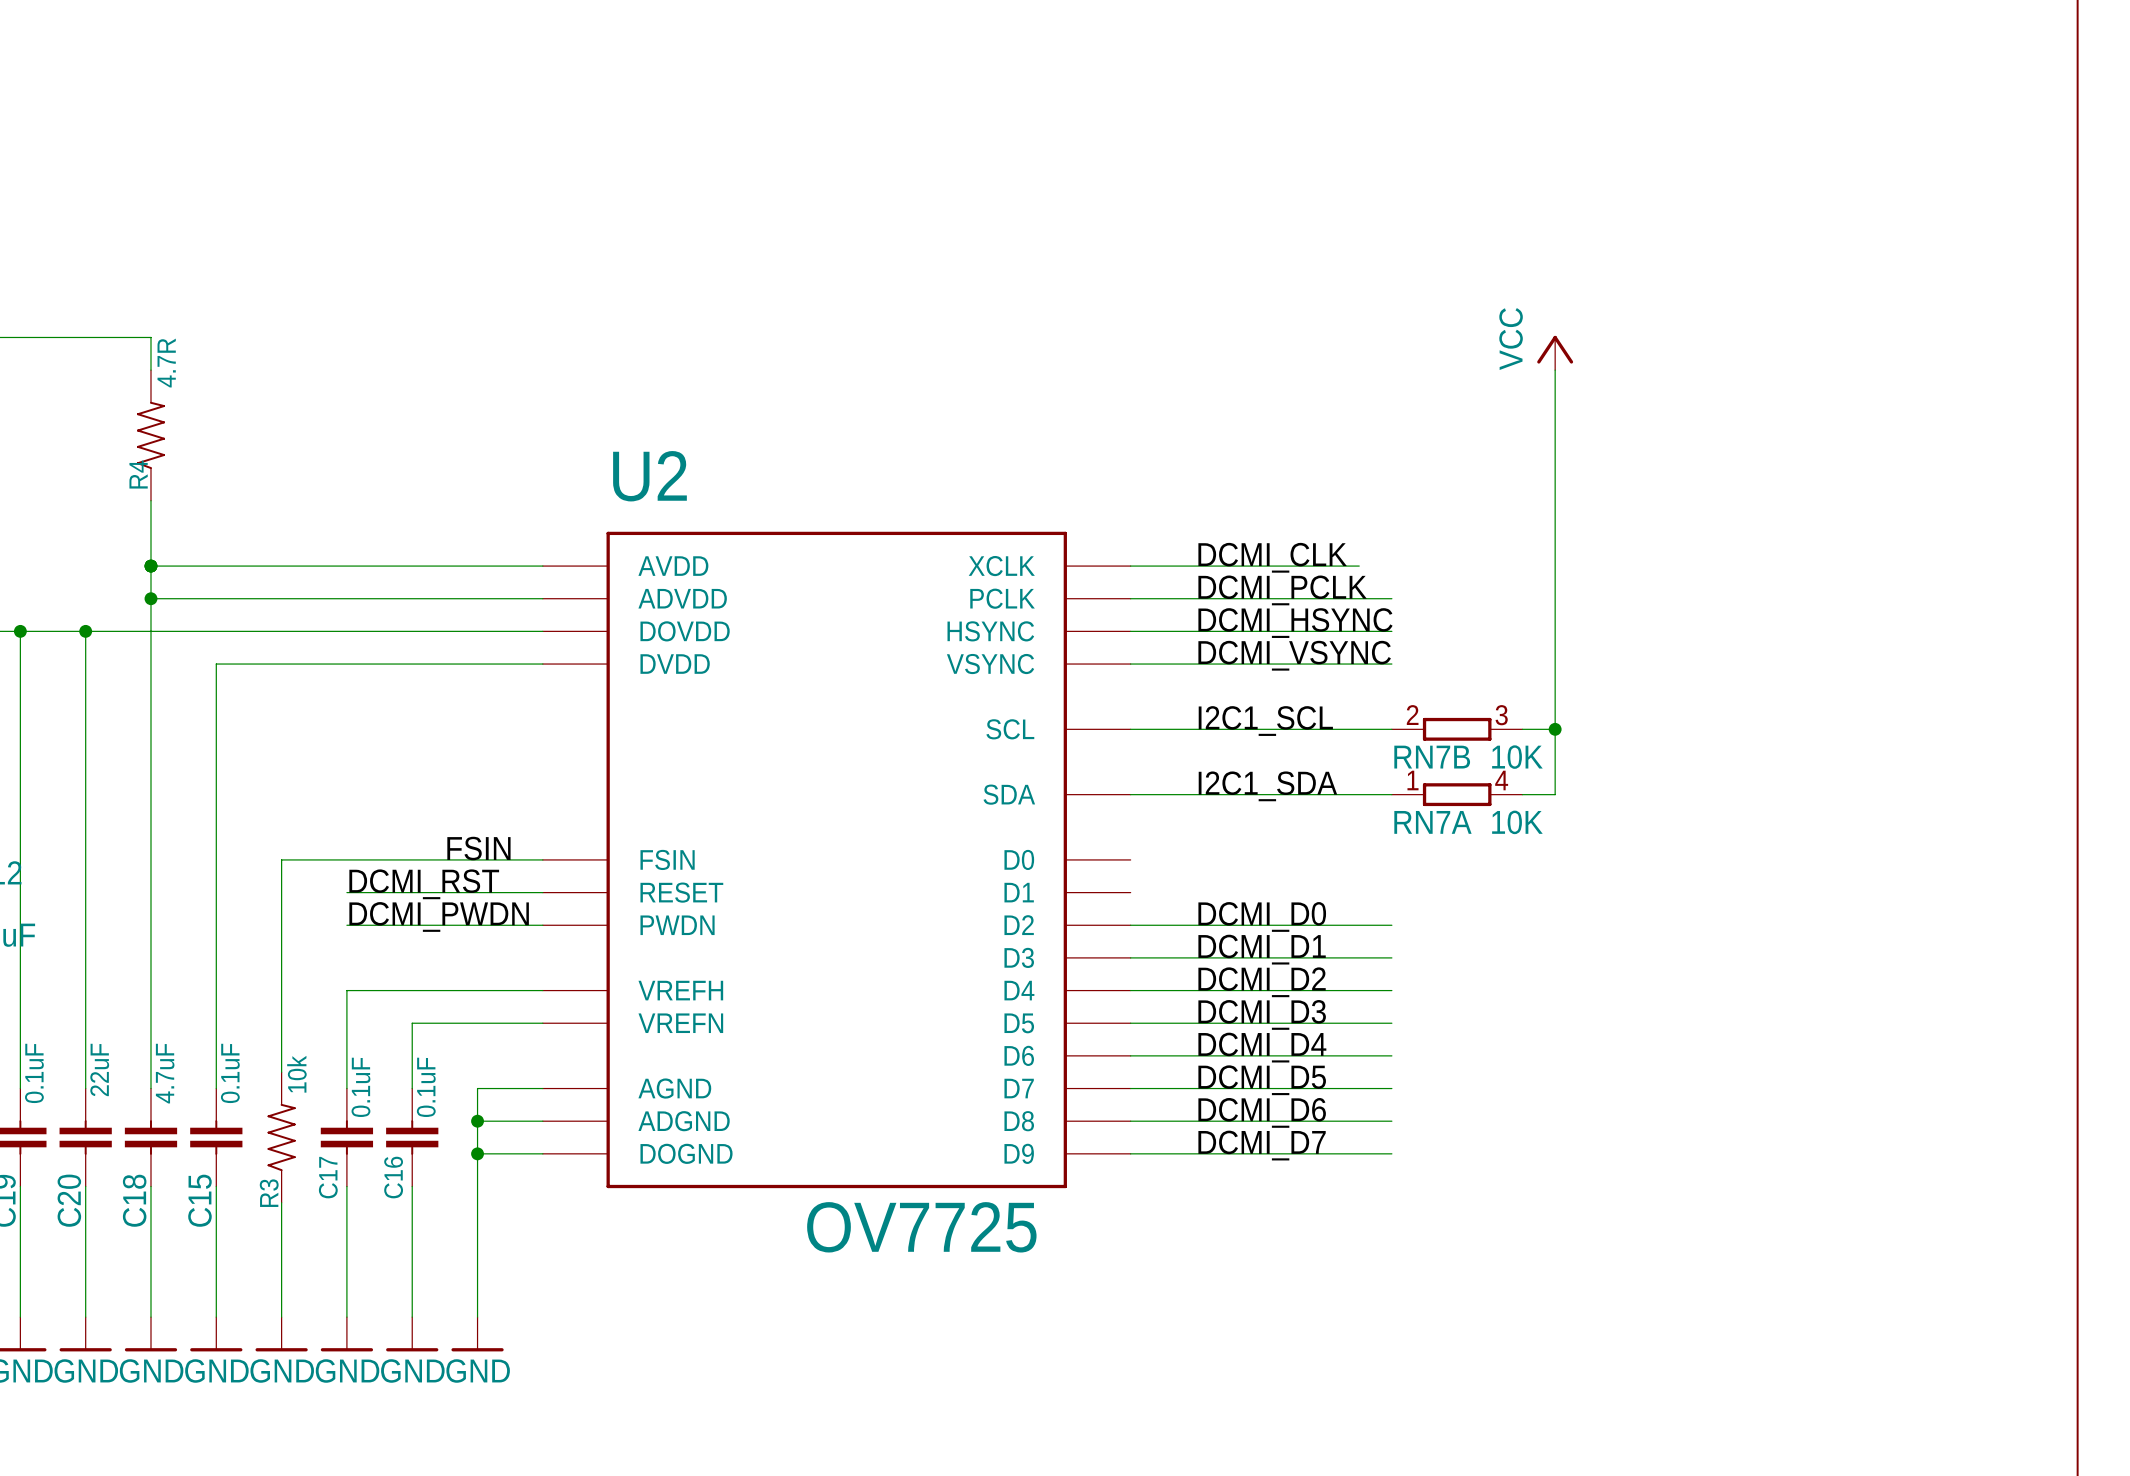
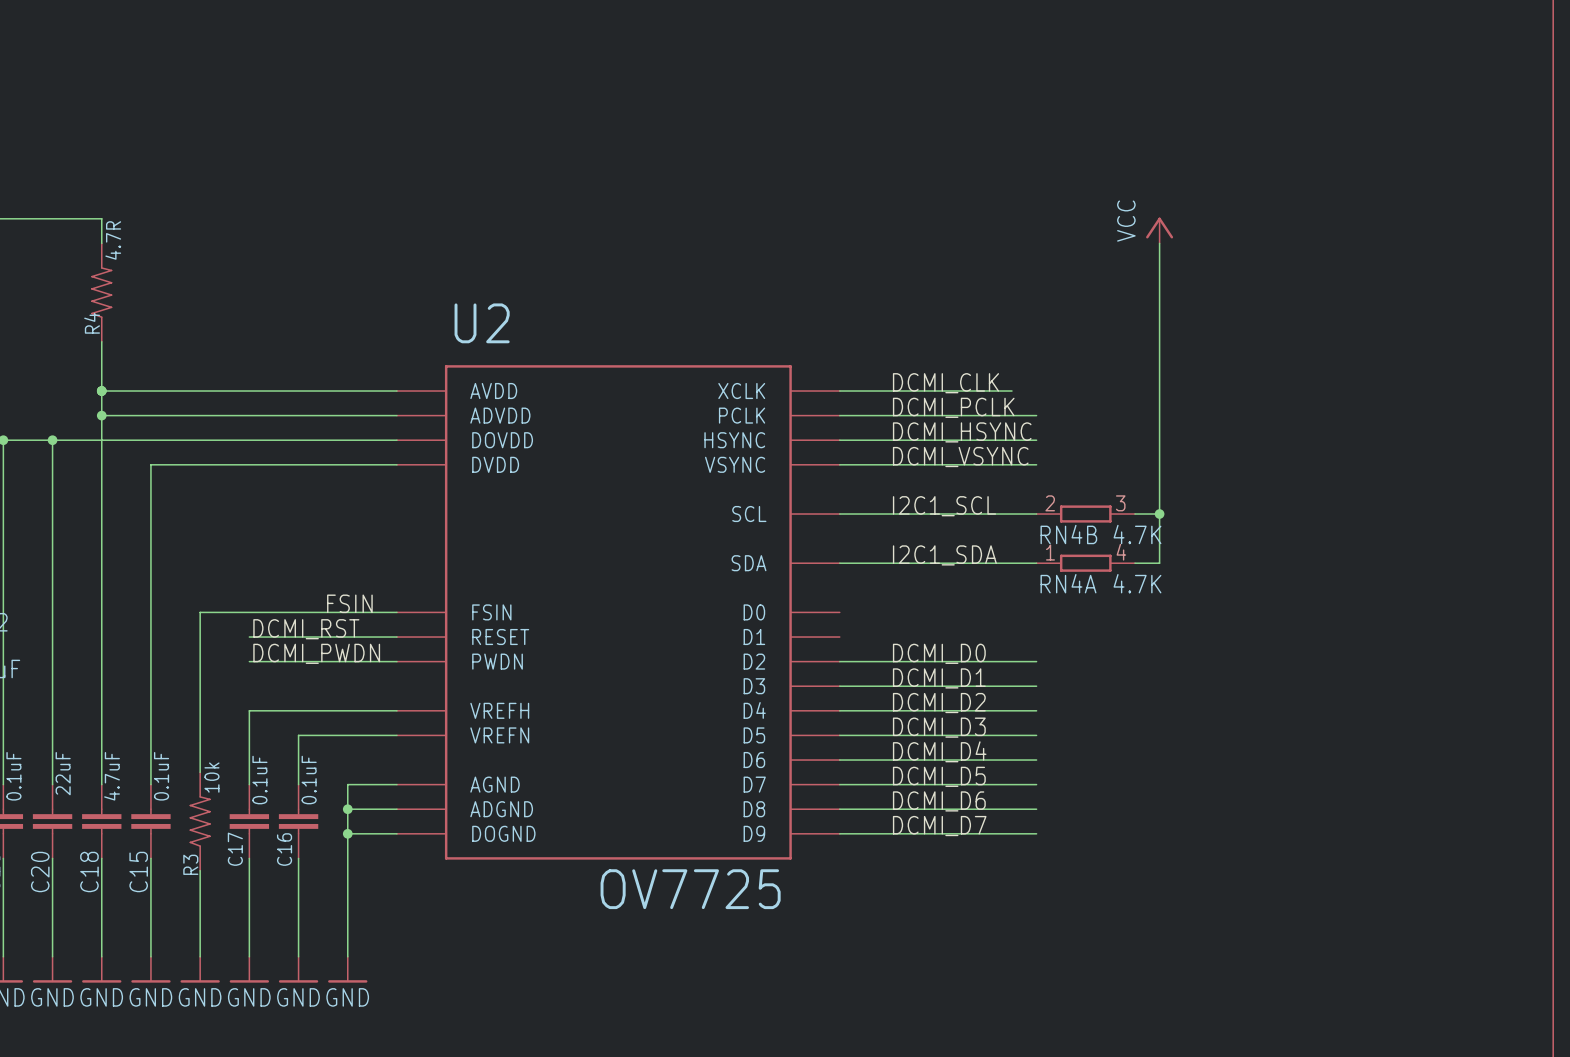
RN7B name: RN7B (1432, 757) -> RN4B (1068, 534)
RN7B value: 10K (1517, 757) -> 4.7K (1137, 534)
RN7A name: RN7A (1432, 822) -> RN4A (1068, 583)
RN7A value: 10K (1517, 822) -> 4.7K (1137, 583)

